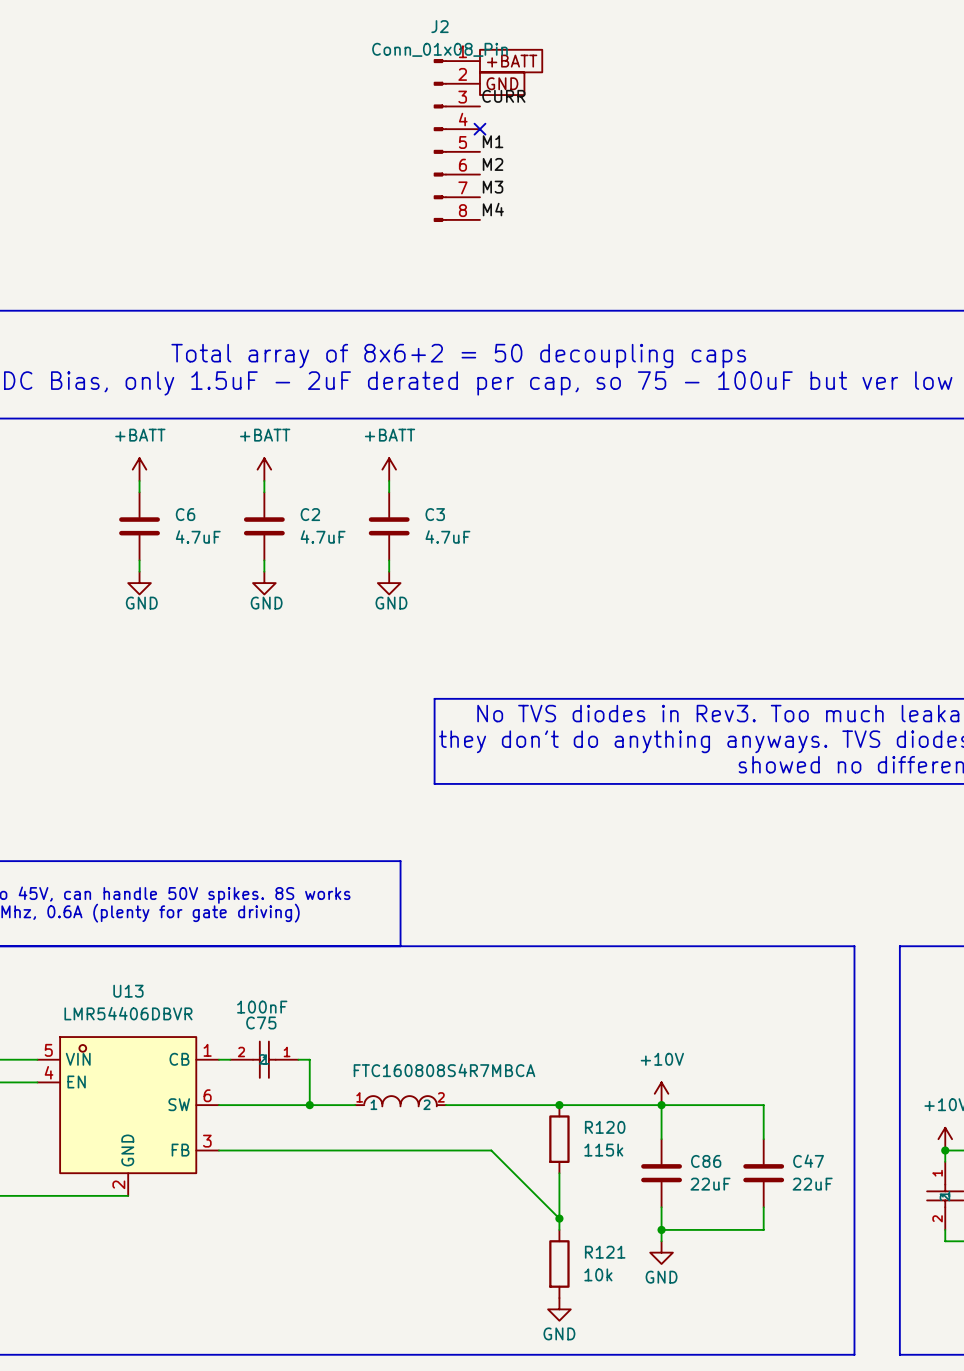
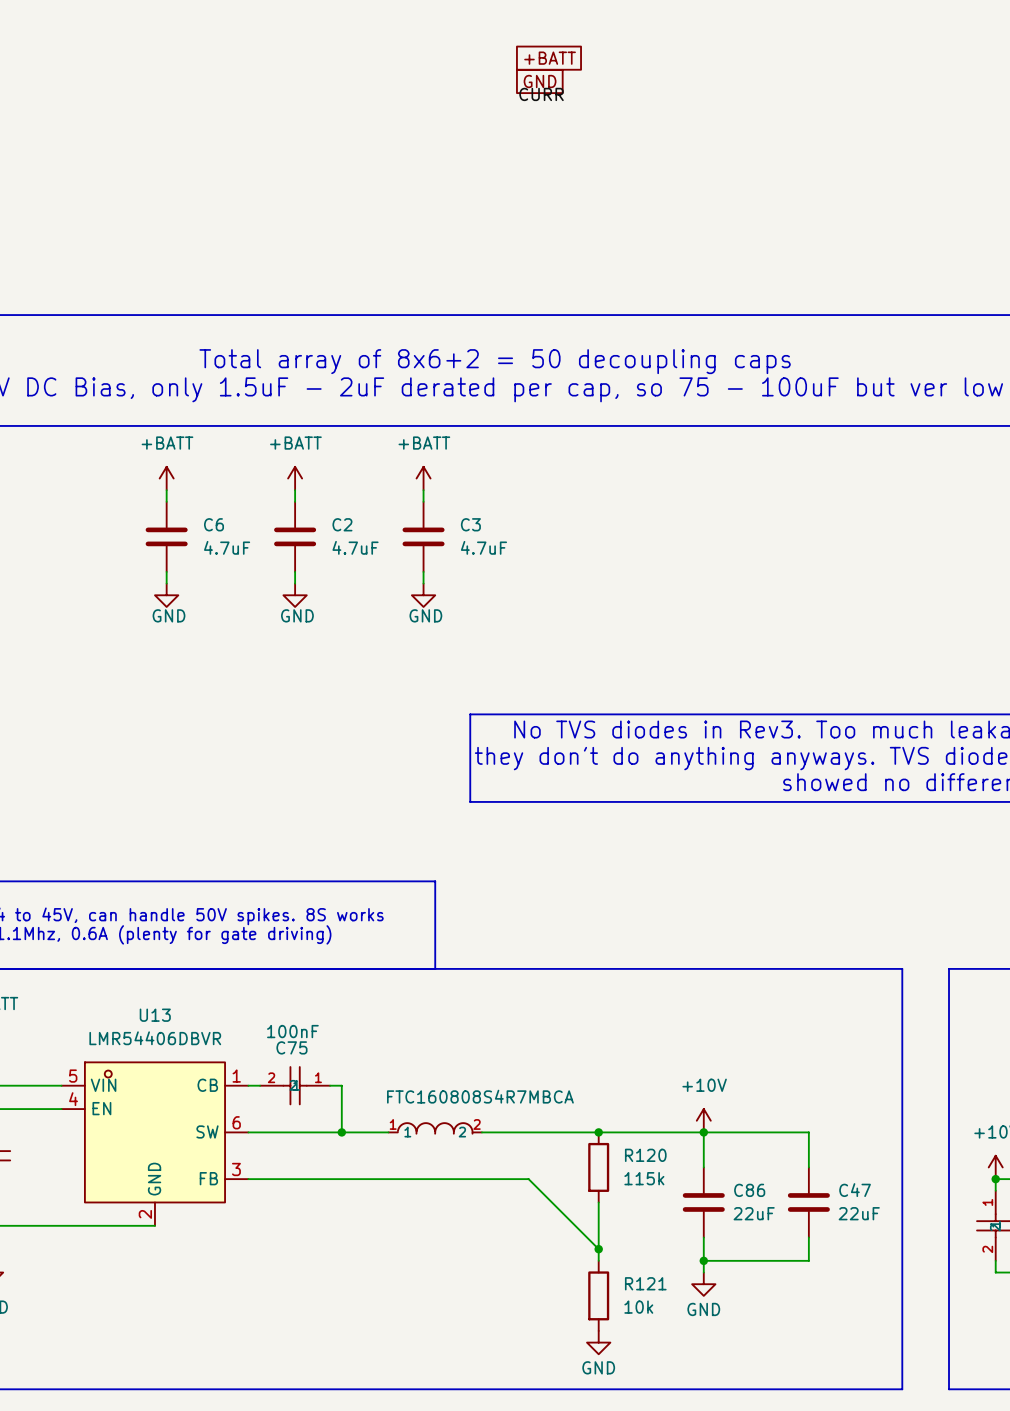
no-connect mark: (479, 129) -> none
J2: Conn_01x08_Pin (456, 140) -> none
label: M1 (493, 141) -> none
label: M2 (493, 164) -> none
label: M3 (493, 187) -> none
label: M4 (493, 209) -> none

